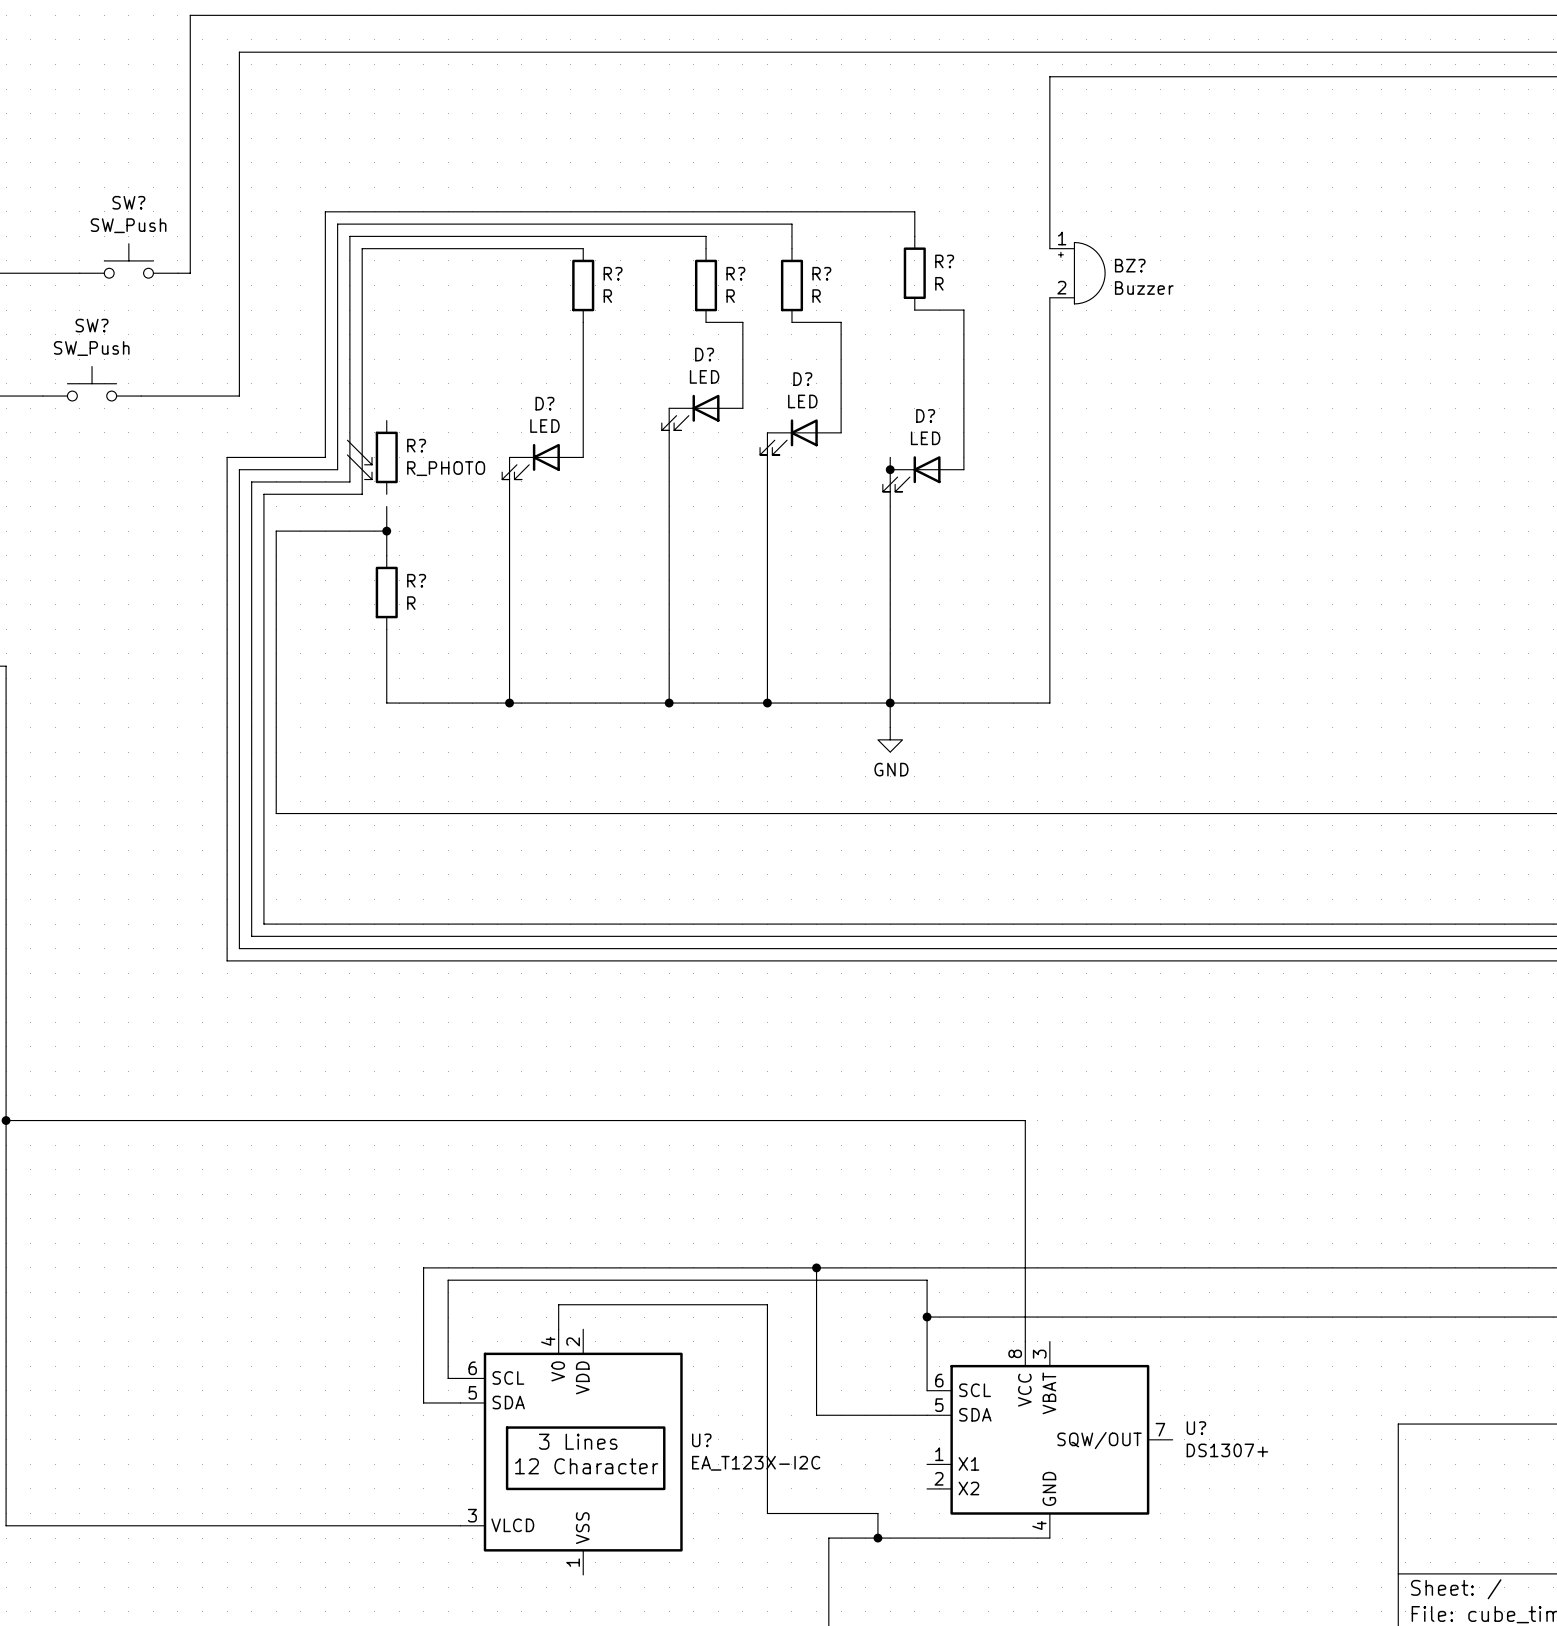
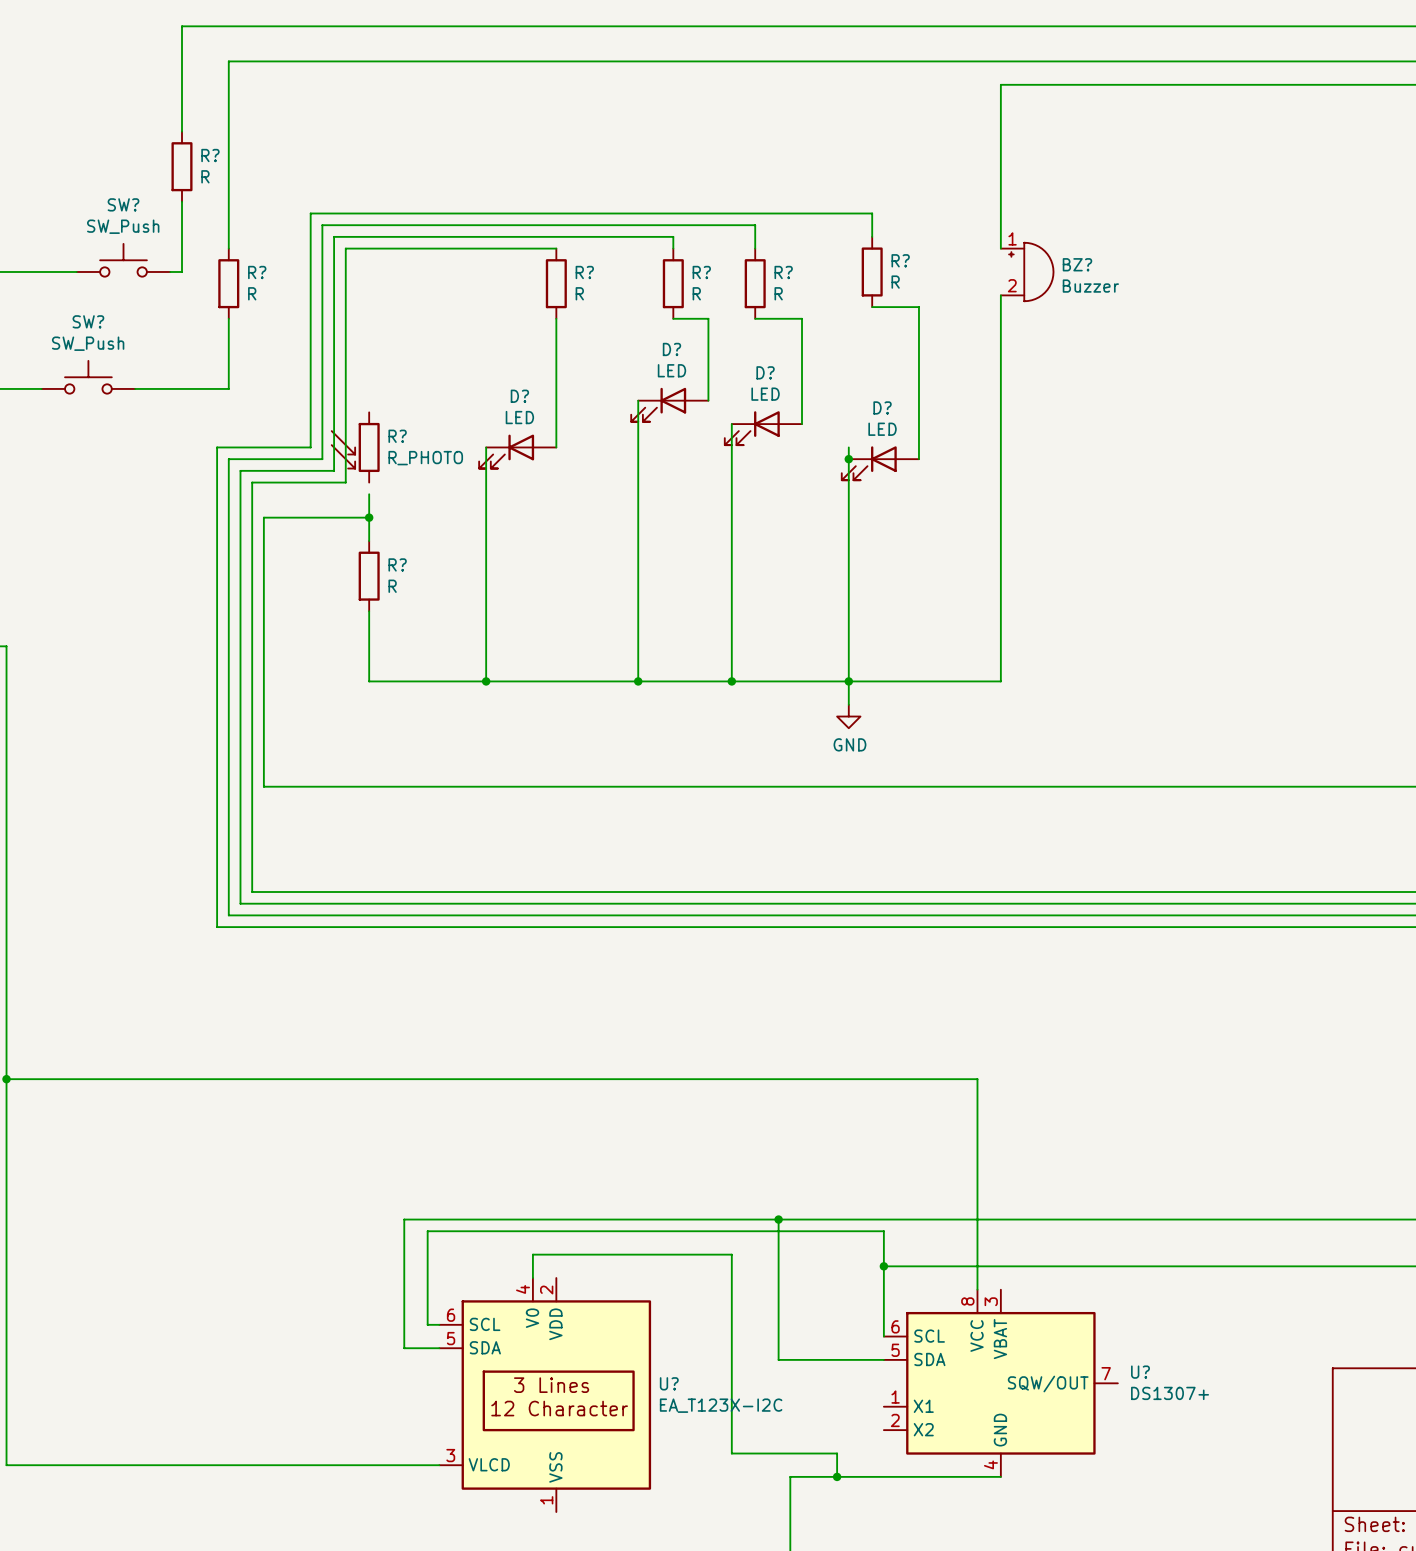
wire: (190, 125) (190, 199) -> none
R?: none -> R (182, 166)
wire: (239, 248) (239, 322) -> none
R?: none -> R (228, 283)

